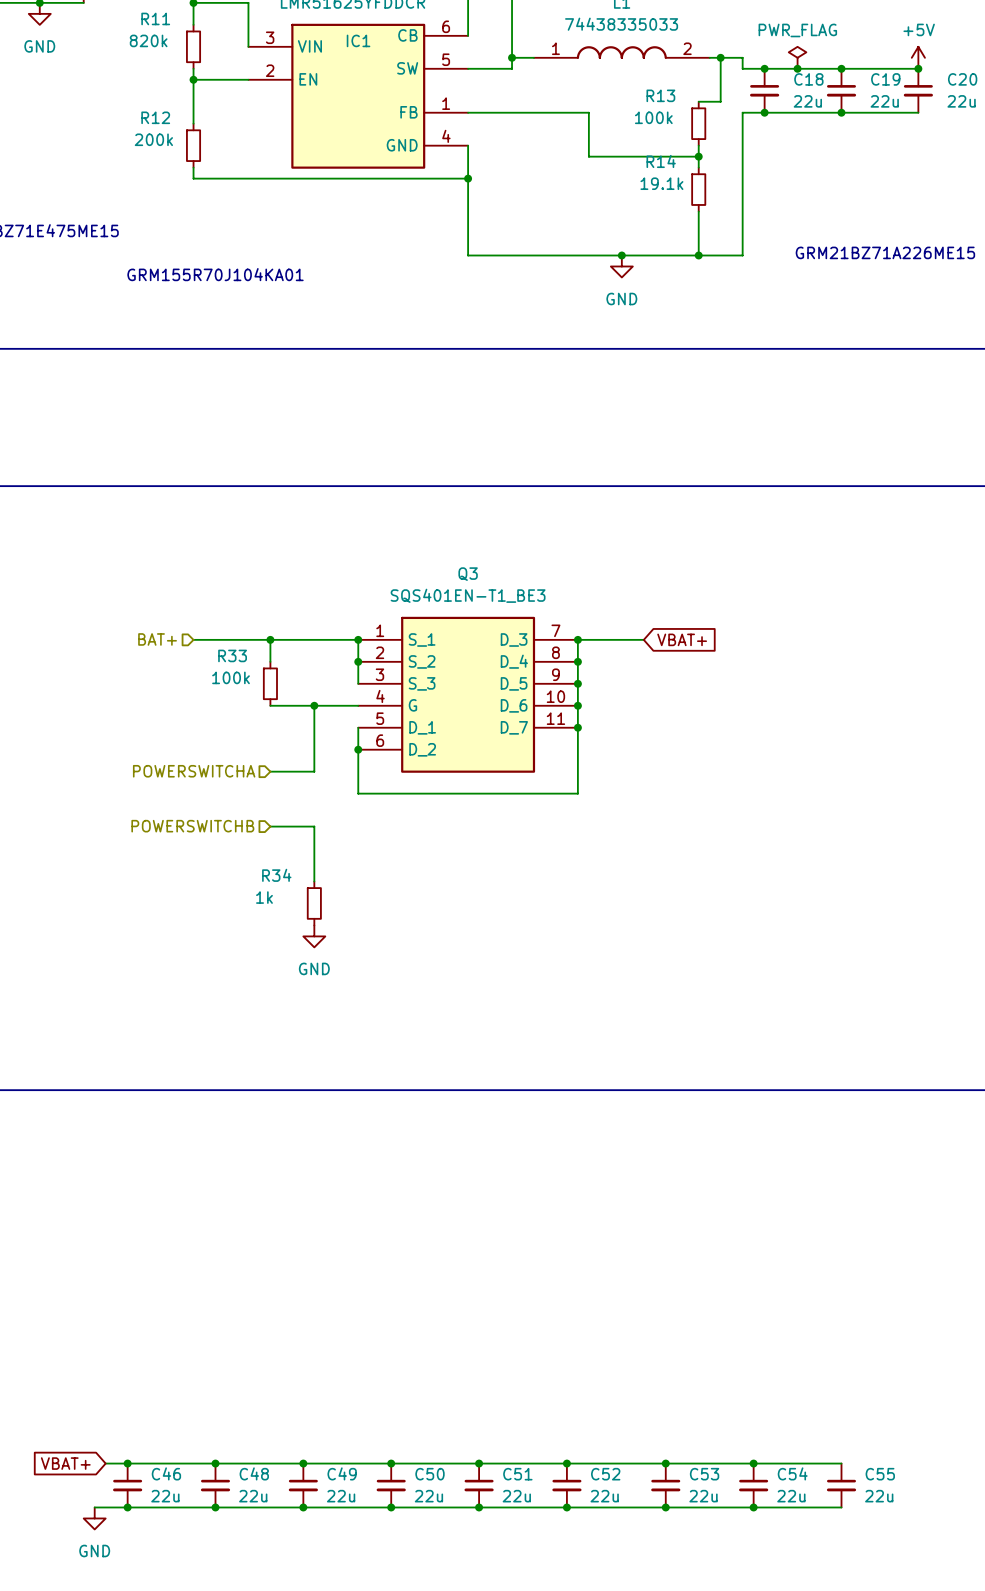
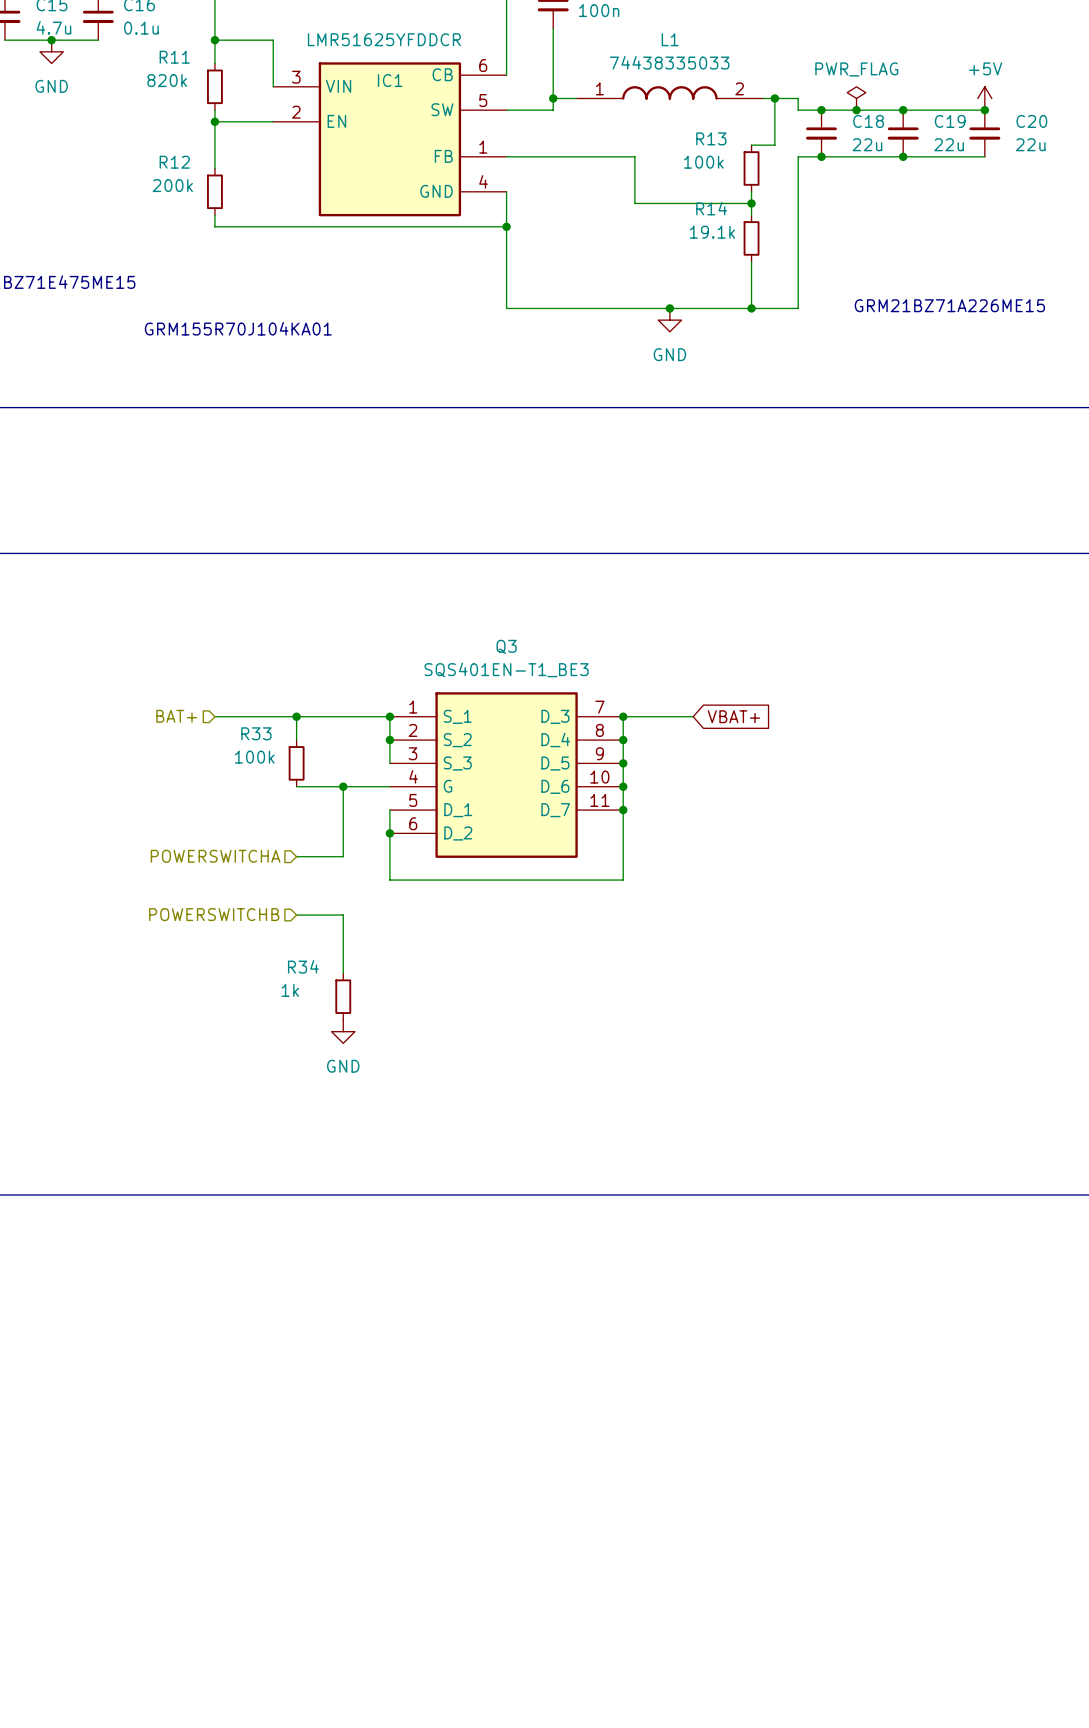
global label: VBAT+ (65, 1463) -> none
wire: (105, 1463) (841, 1463) -> none
junction: (127, 1463) -> none
junction: (215, 1463) -> none
junction: (303, 1463) -> none
junction: (391, 1463) -> none
junction: (479, 1463) -> none
junction: (566, 1463) -> none
junction: (665, 1463) -> none
junction: (753, 1463) -> none
C46: 22u (127, 1485) -> none
C48: 22u (215, 1485) -> none
C49: 22u (303, 1485) -> none
C50: 22u (391, 1485) -> none
C51: 22u (479, 1485) -> none
C52: 22u (566, 1485) -> none
C53: 22u (665, 1485) -> none
C54: 22u (753, 1485) -> none
C55: 22u (841, 1485) -> none
wire: (94, 1507) (841, 1507) -> none
junction: (127, 1507) -> none
junction: (215, 1507) -> none
junction: (303, 1507) -> none
junction: (391, 1507) -> none
junction: (479, 1507) -> none
junction: (566, 1507) -> none
junction: (665, 1507) -> none
junction: (753, 1507) -> none
power symbol: GND (94, 1518) -> none

